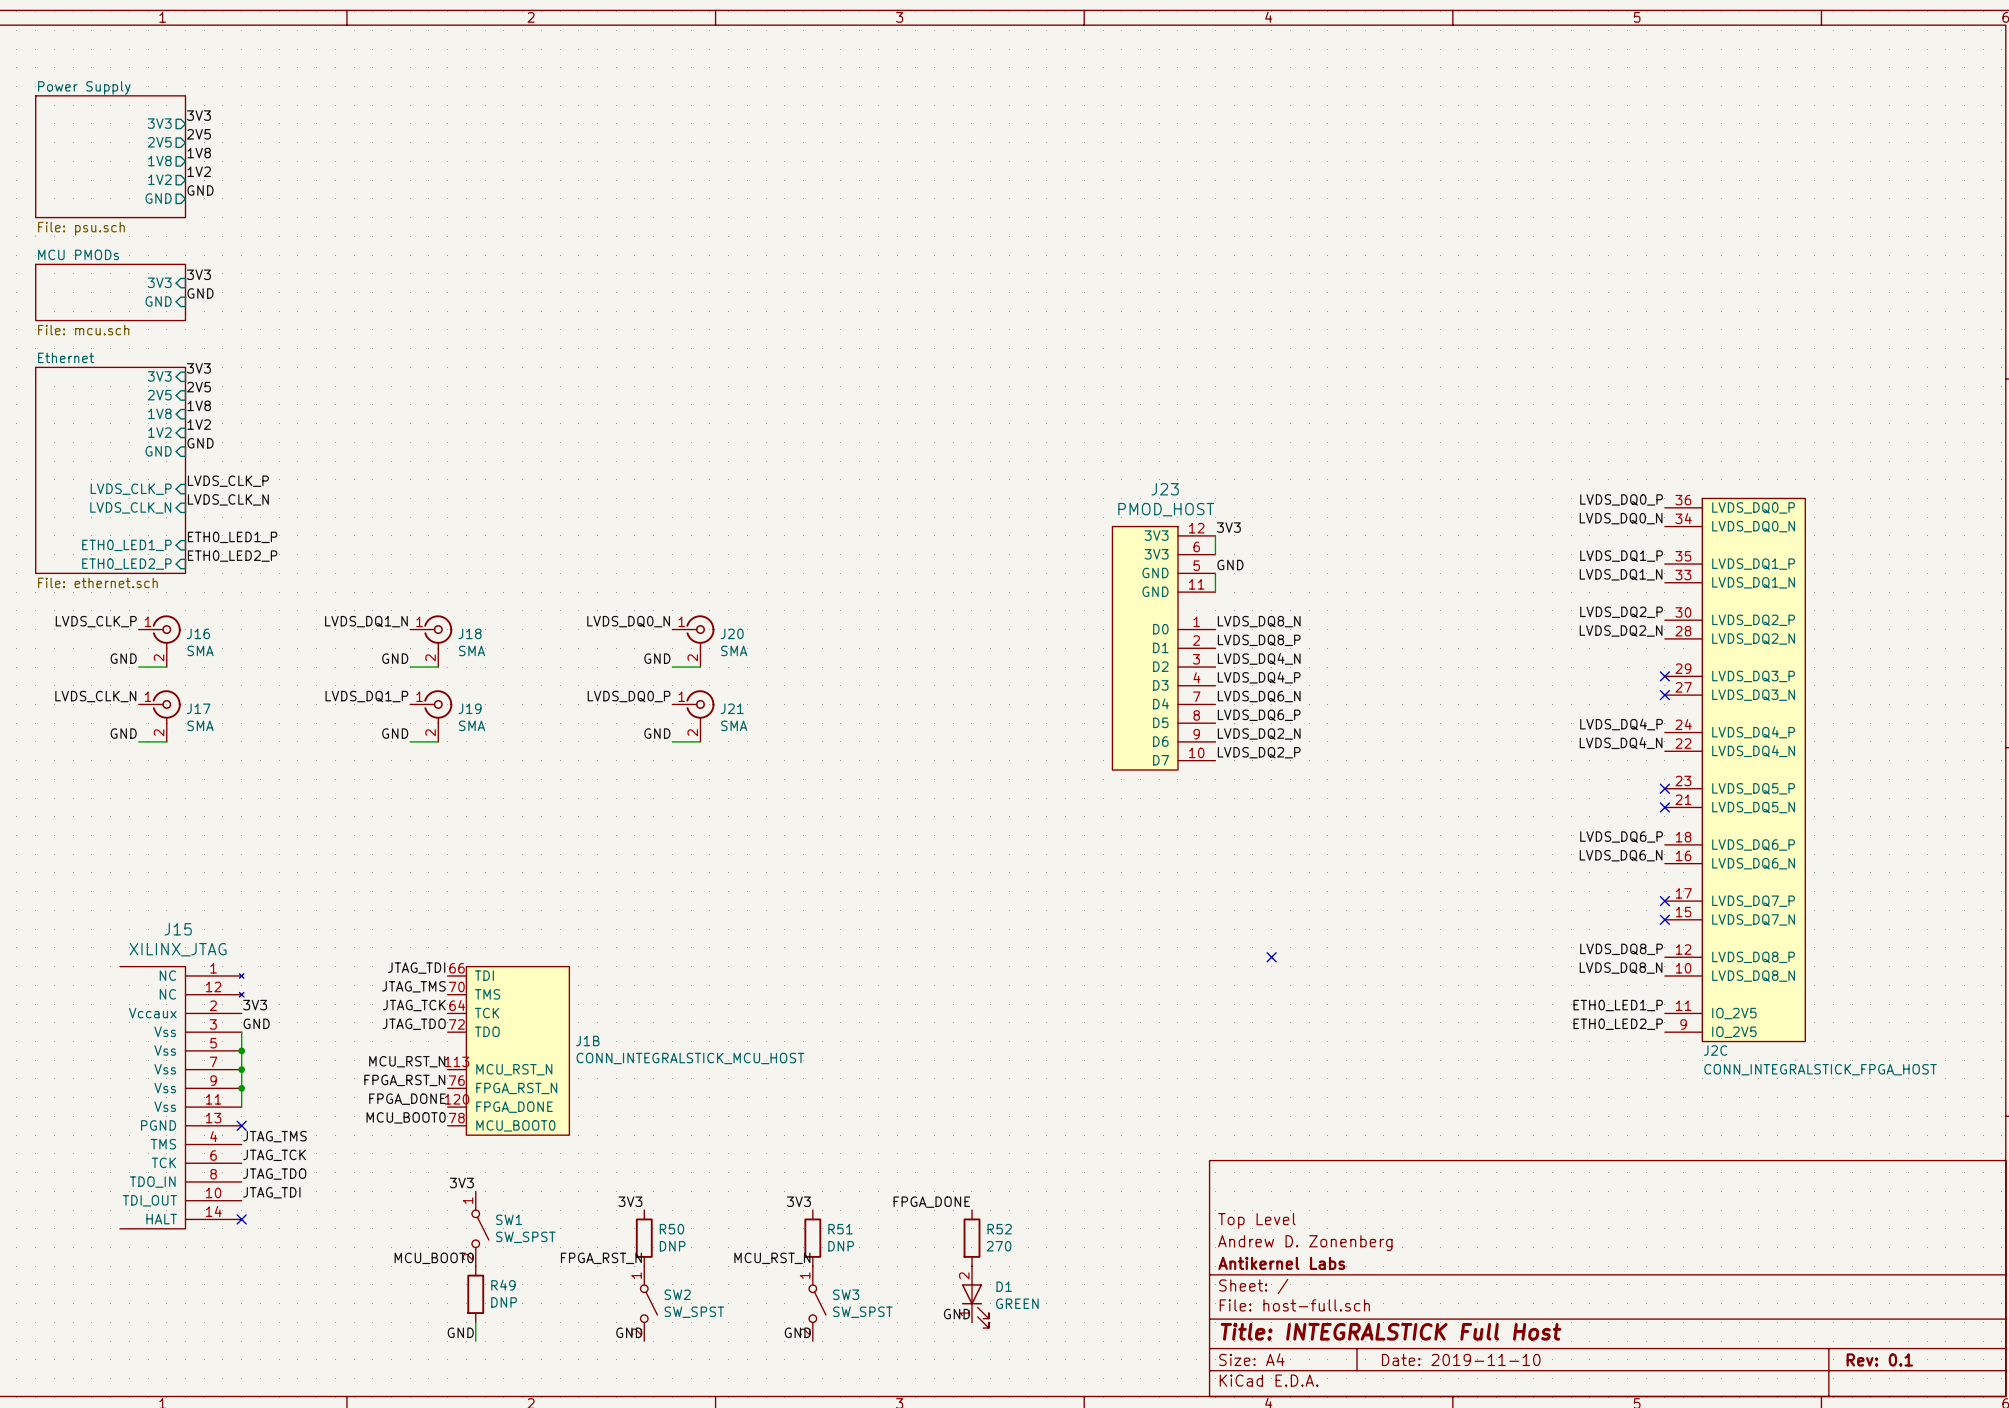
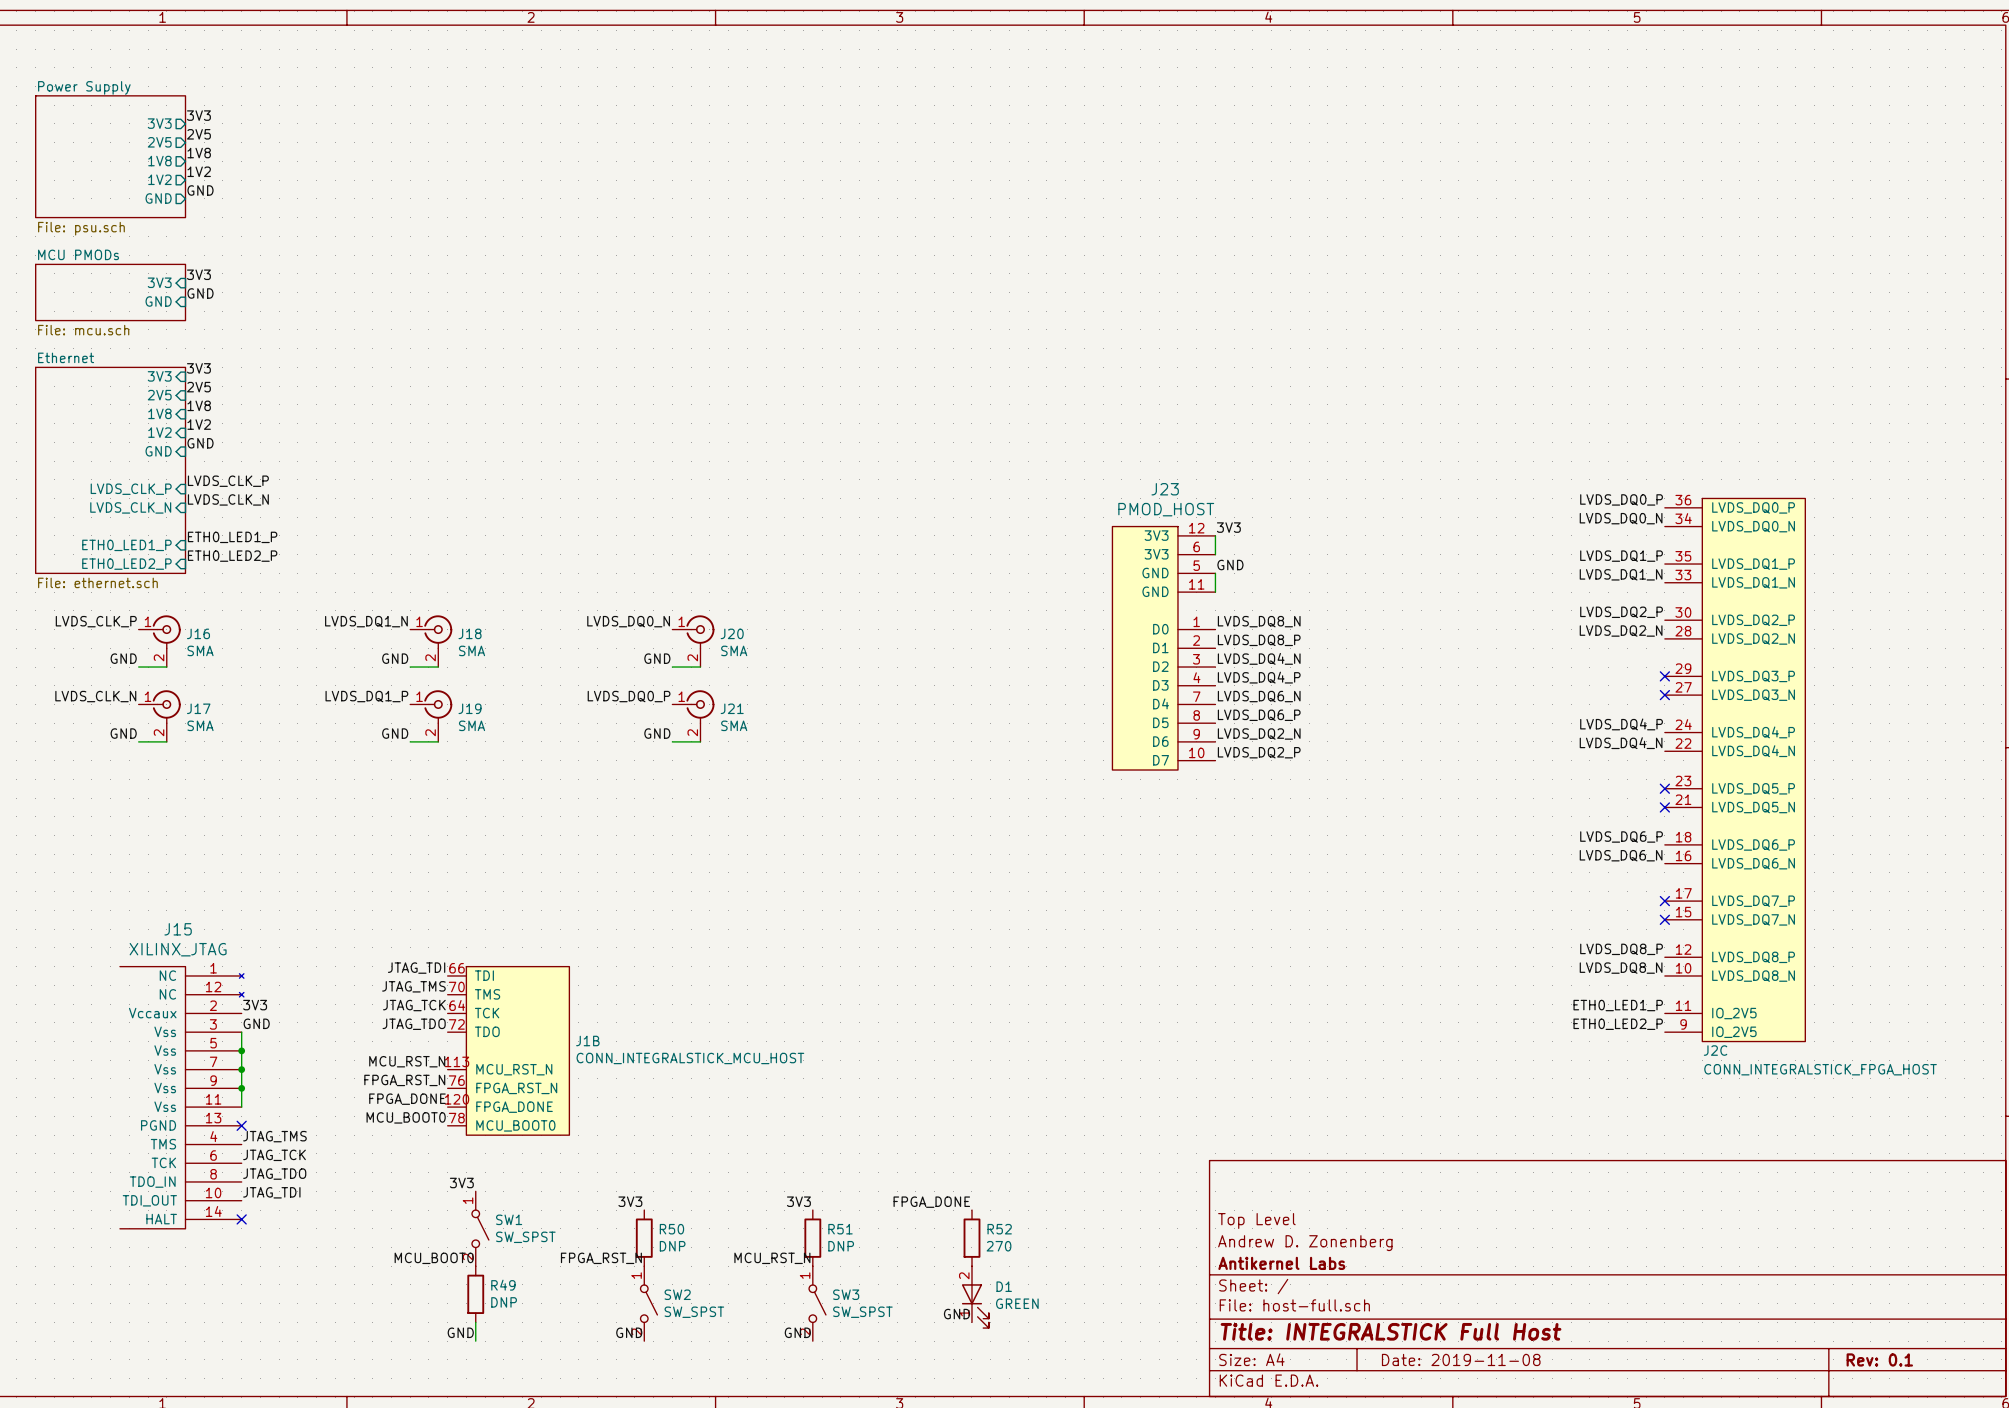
no-connect mark: (1271, 957) -> none
title block: Date: 2019-11-10 (1461, 1359) -> Date: 2019-11-08 (1461, 1359)

